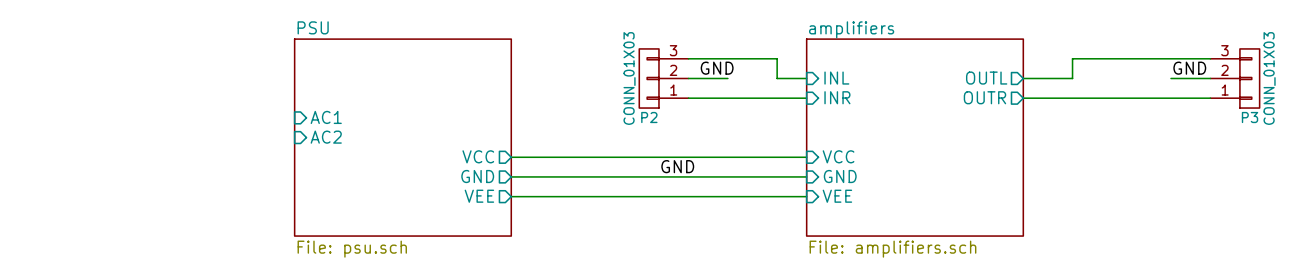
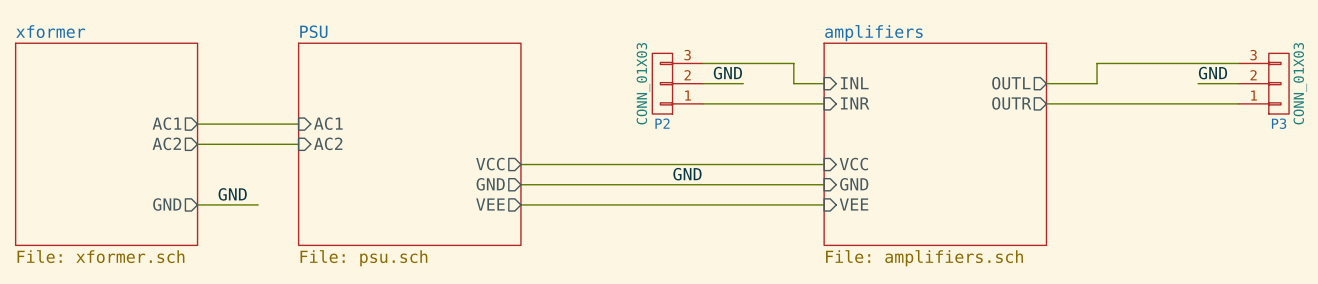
sheet pin: none -> AC1 (166, 123)
wire: none -> (197, 124) (298, 124)
sheet xformer: none -> File: xformer.sch (106, 144)
sheet pin: none -> AC2 (166, 143)
wire: none -> (197, 144) (298, 144)
label: none -> GND (232, 194)
sheet pin: none -> GND (167, 204)
wire: none -> (197, 204) (258, 204)

